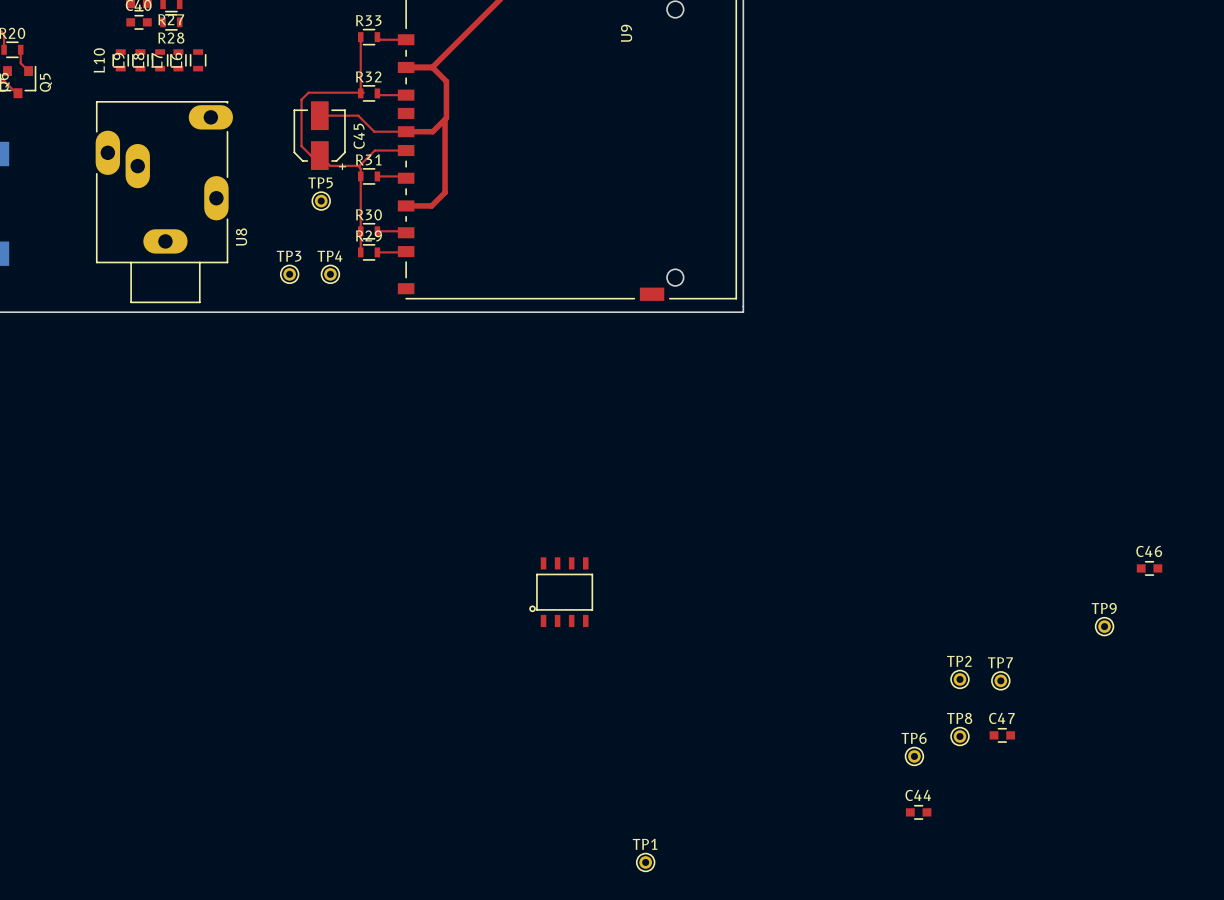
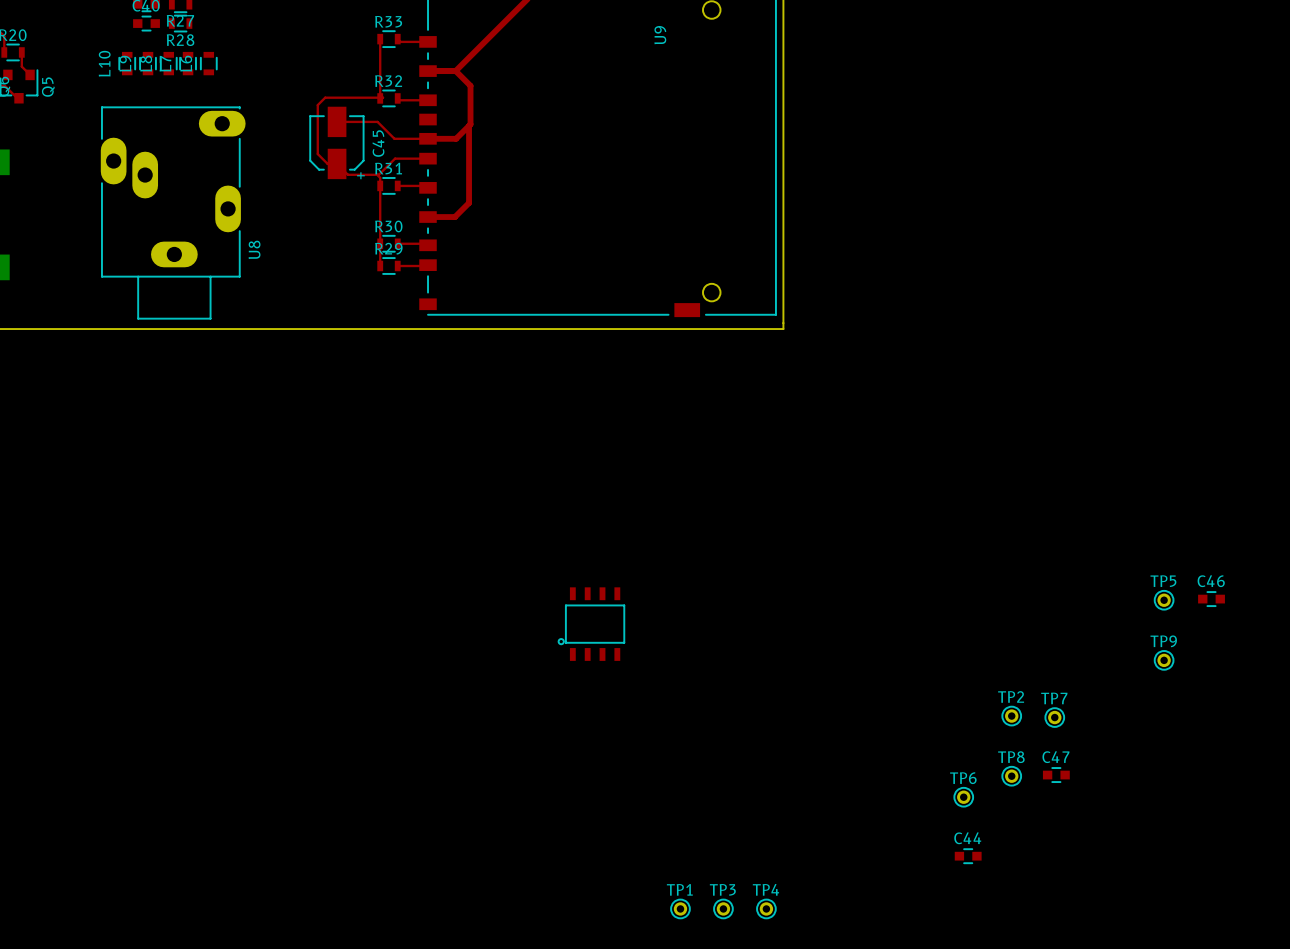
TP5 position: (321, 201) -> (1164, 600)
TP3 position: (289, 274) -> (723, 908)
TP4 position: (330, 274) -> (766, 908)

